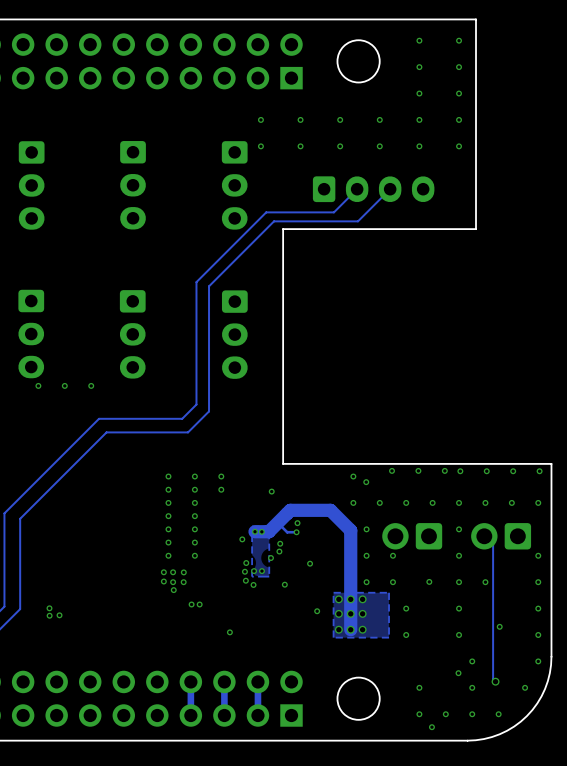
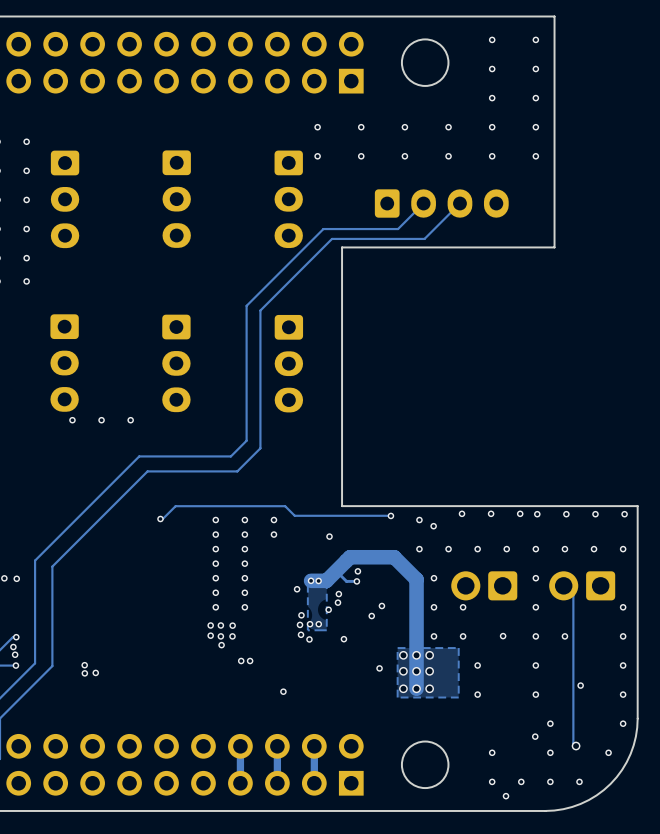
track: none -> (390, 515) (294, 515) (285, 506) (175, 506) (162, 518) (160, 518)
via: none -> (390, 515)
via: none -> (160, 518)
via: none -> (381, 605)

